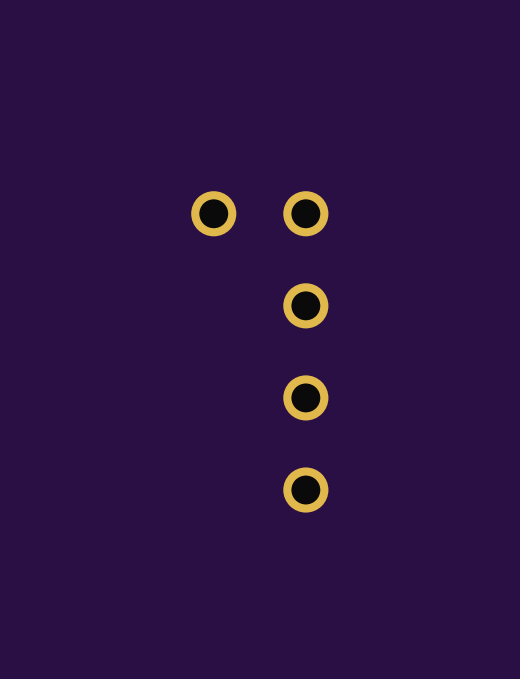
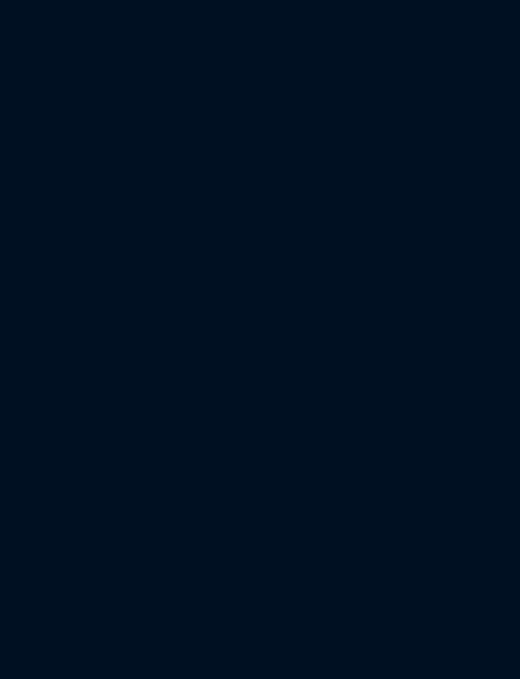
part: (213, 213) -> none
part: (305, 213) -> none
part: (305, 305) -> none
part: (305, 397) -> none
part: (305, 490) -> none

